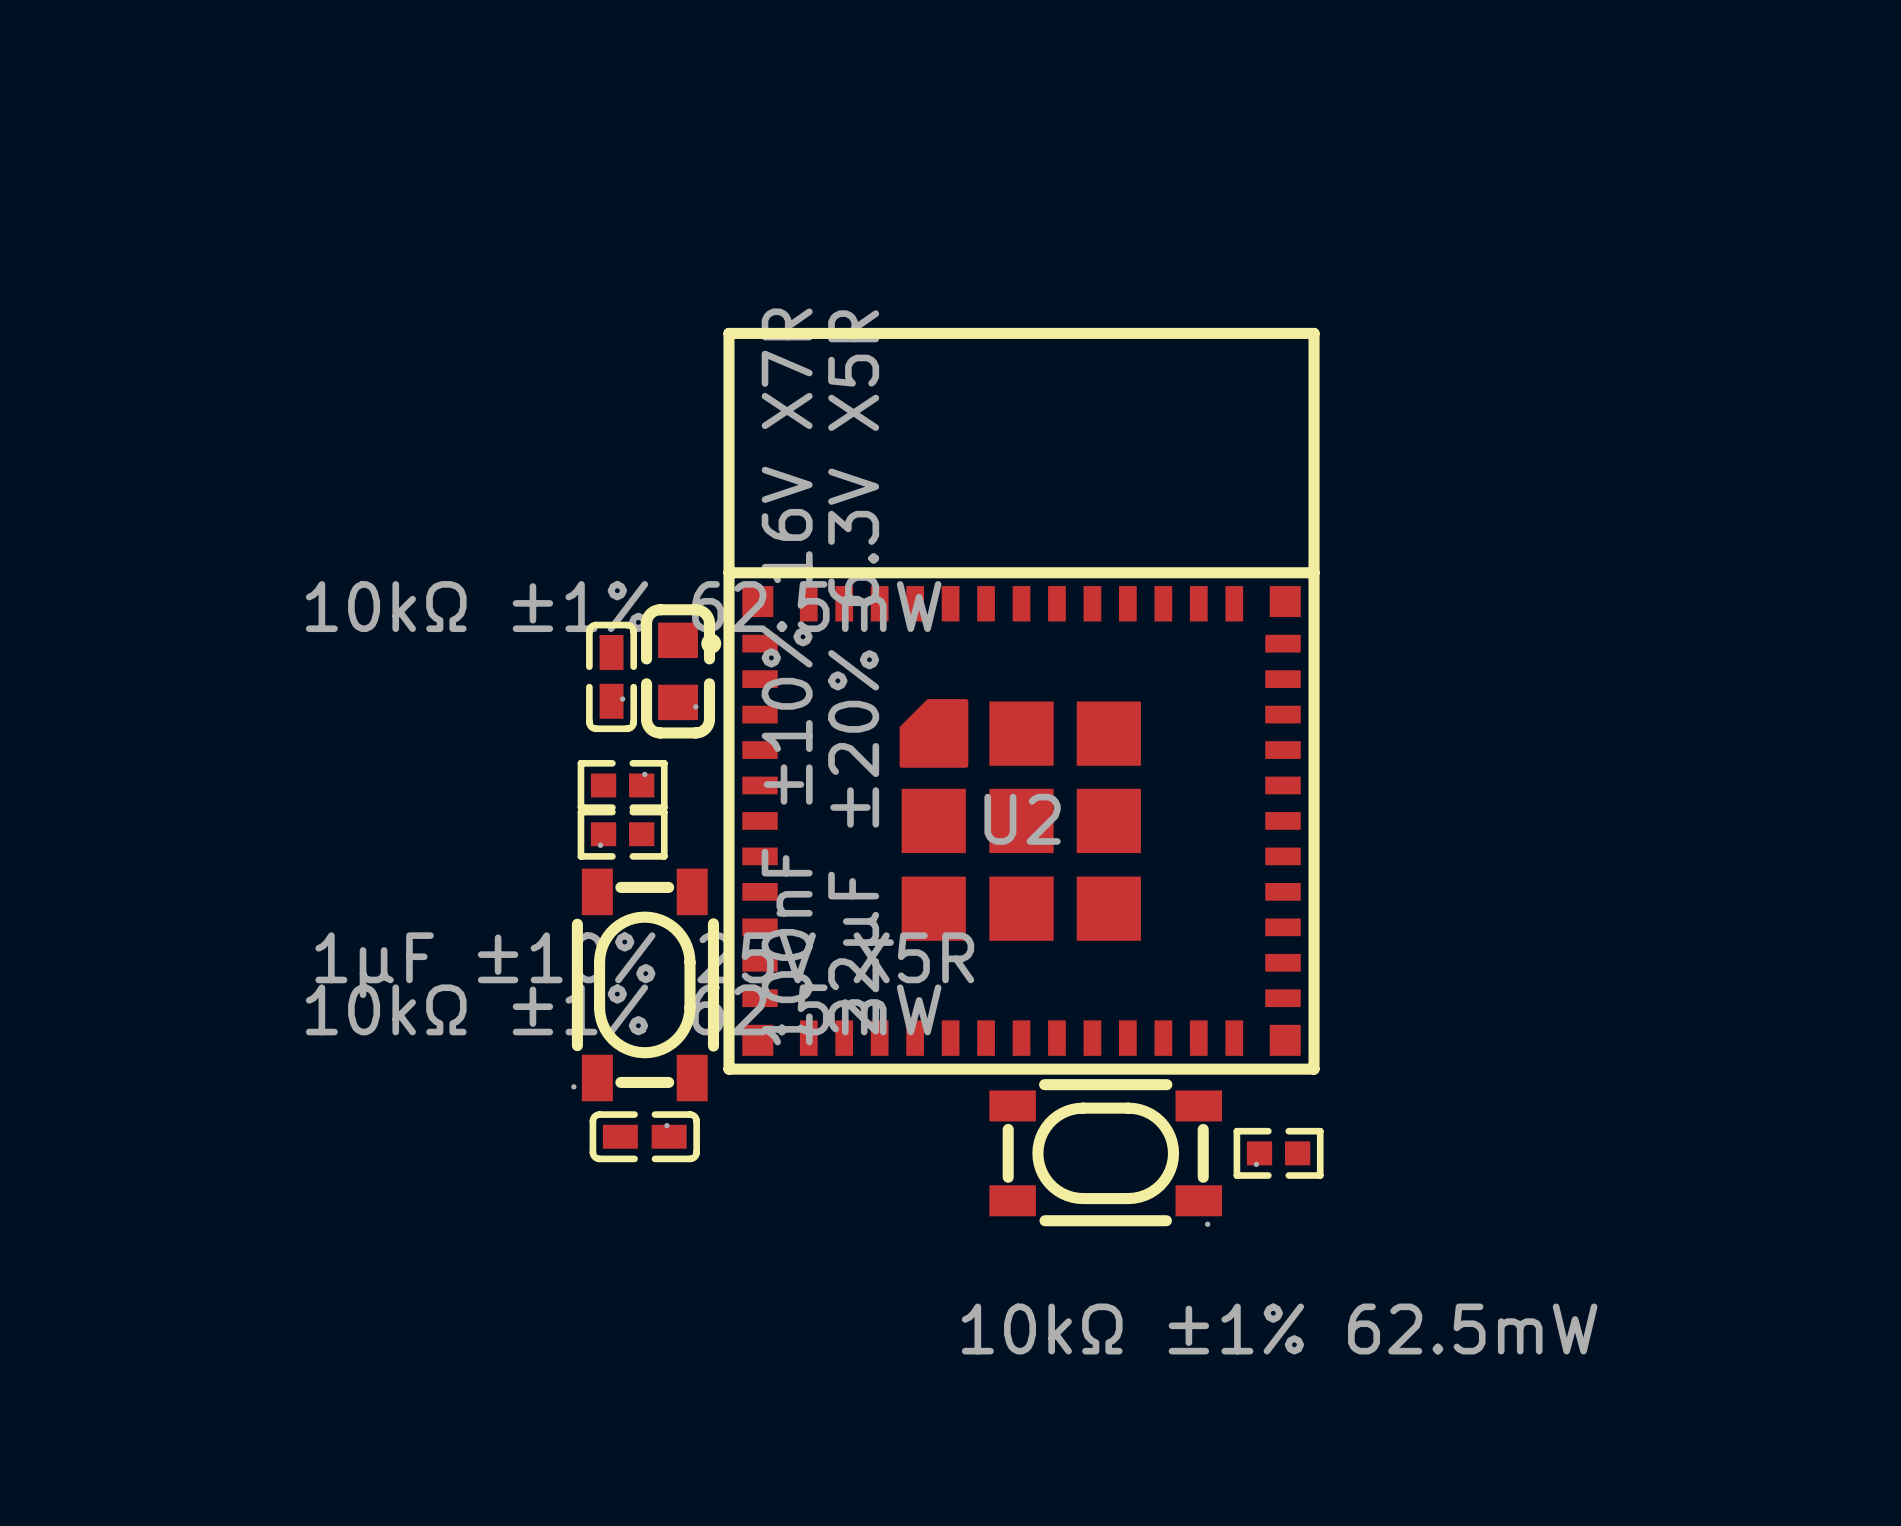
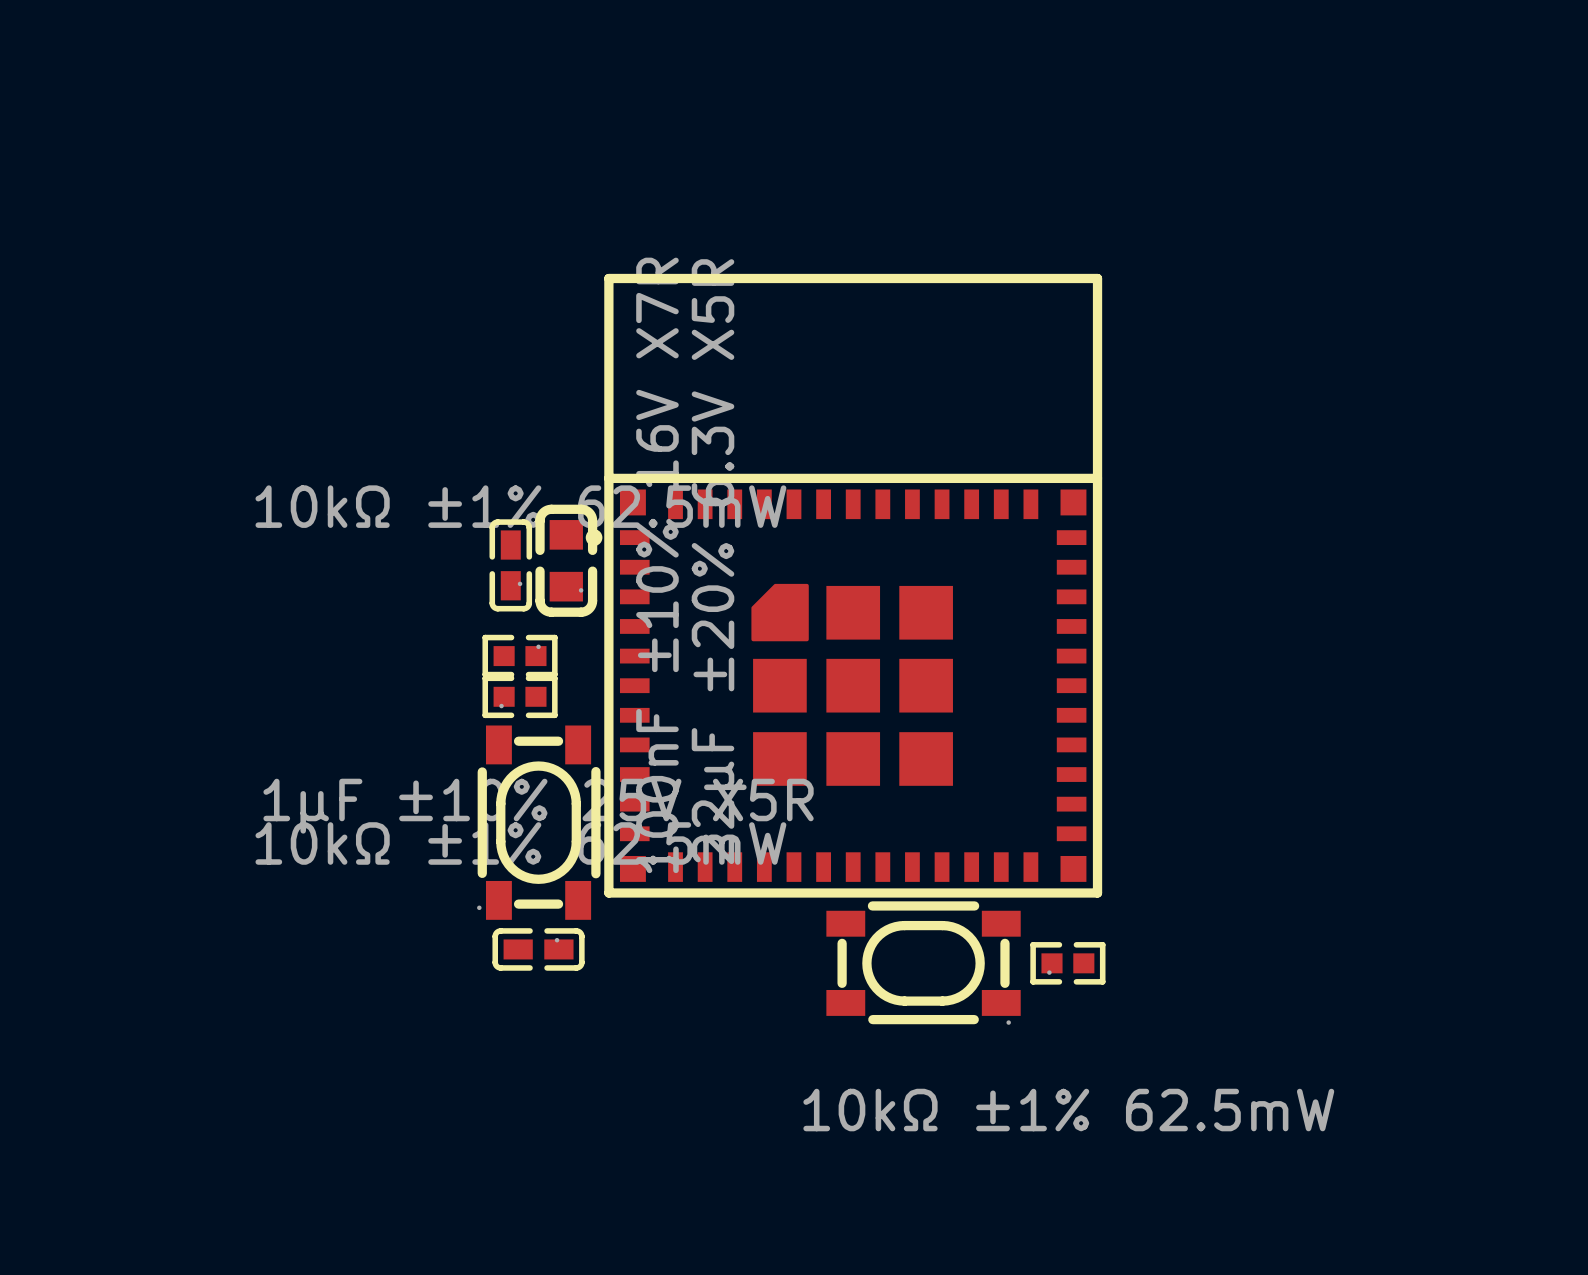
U2 name: U2 (1022, 819) -> none

